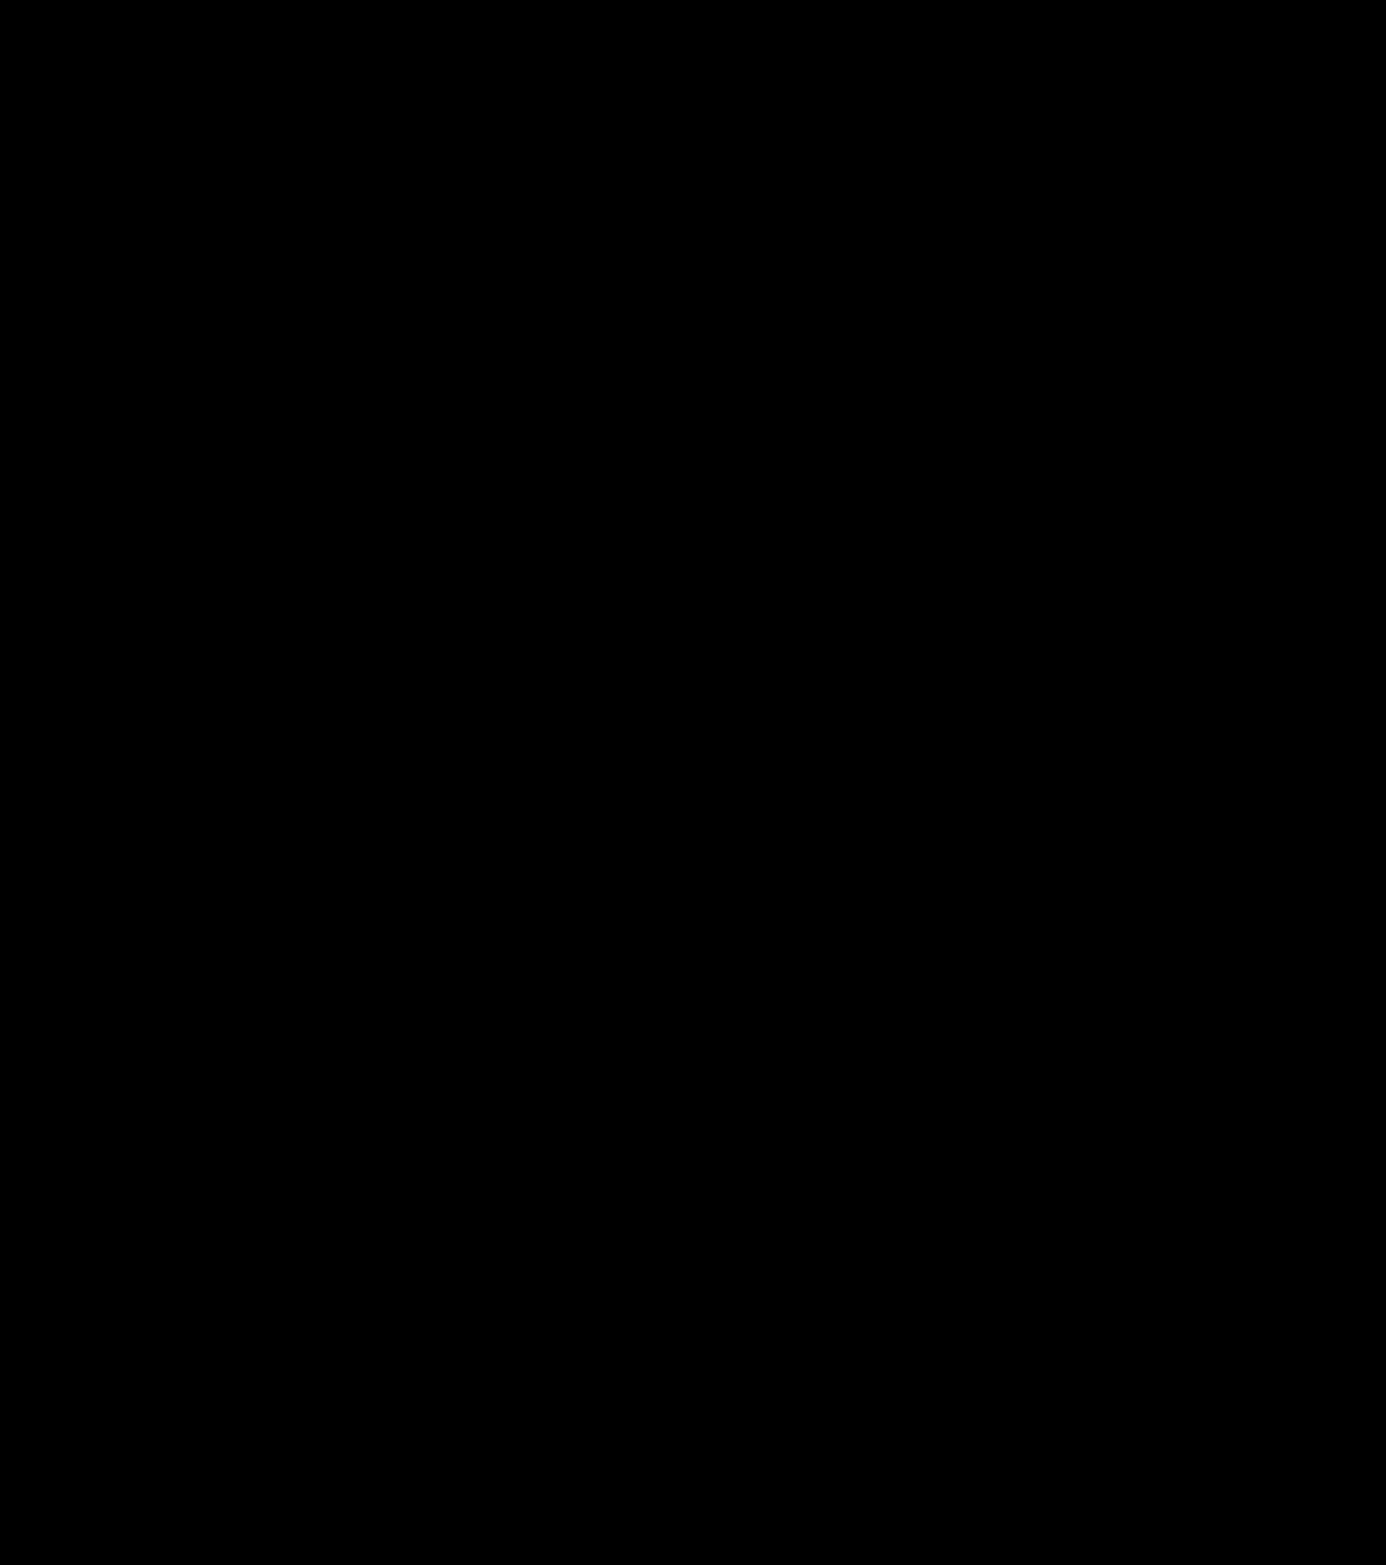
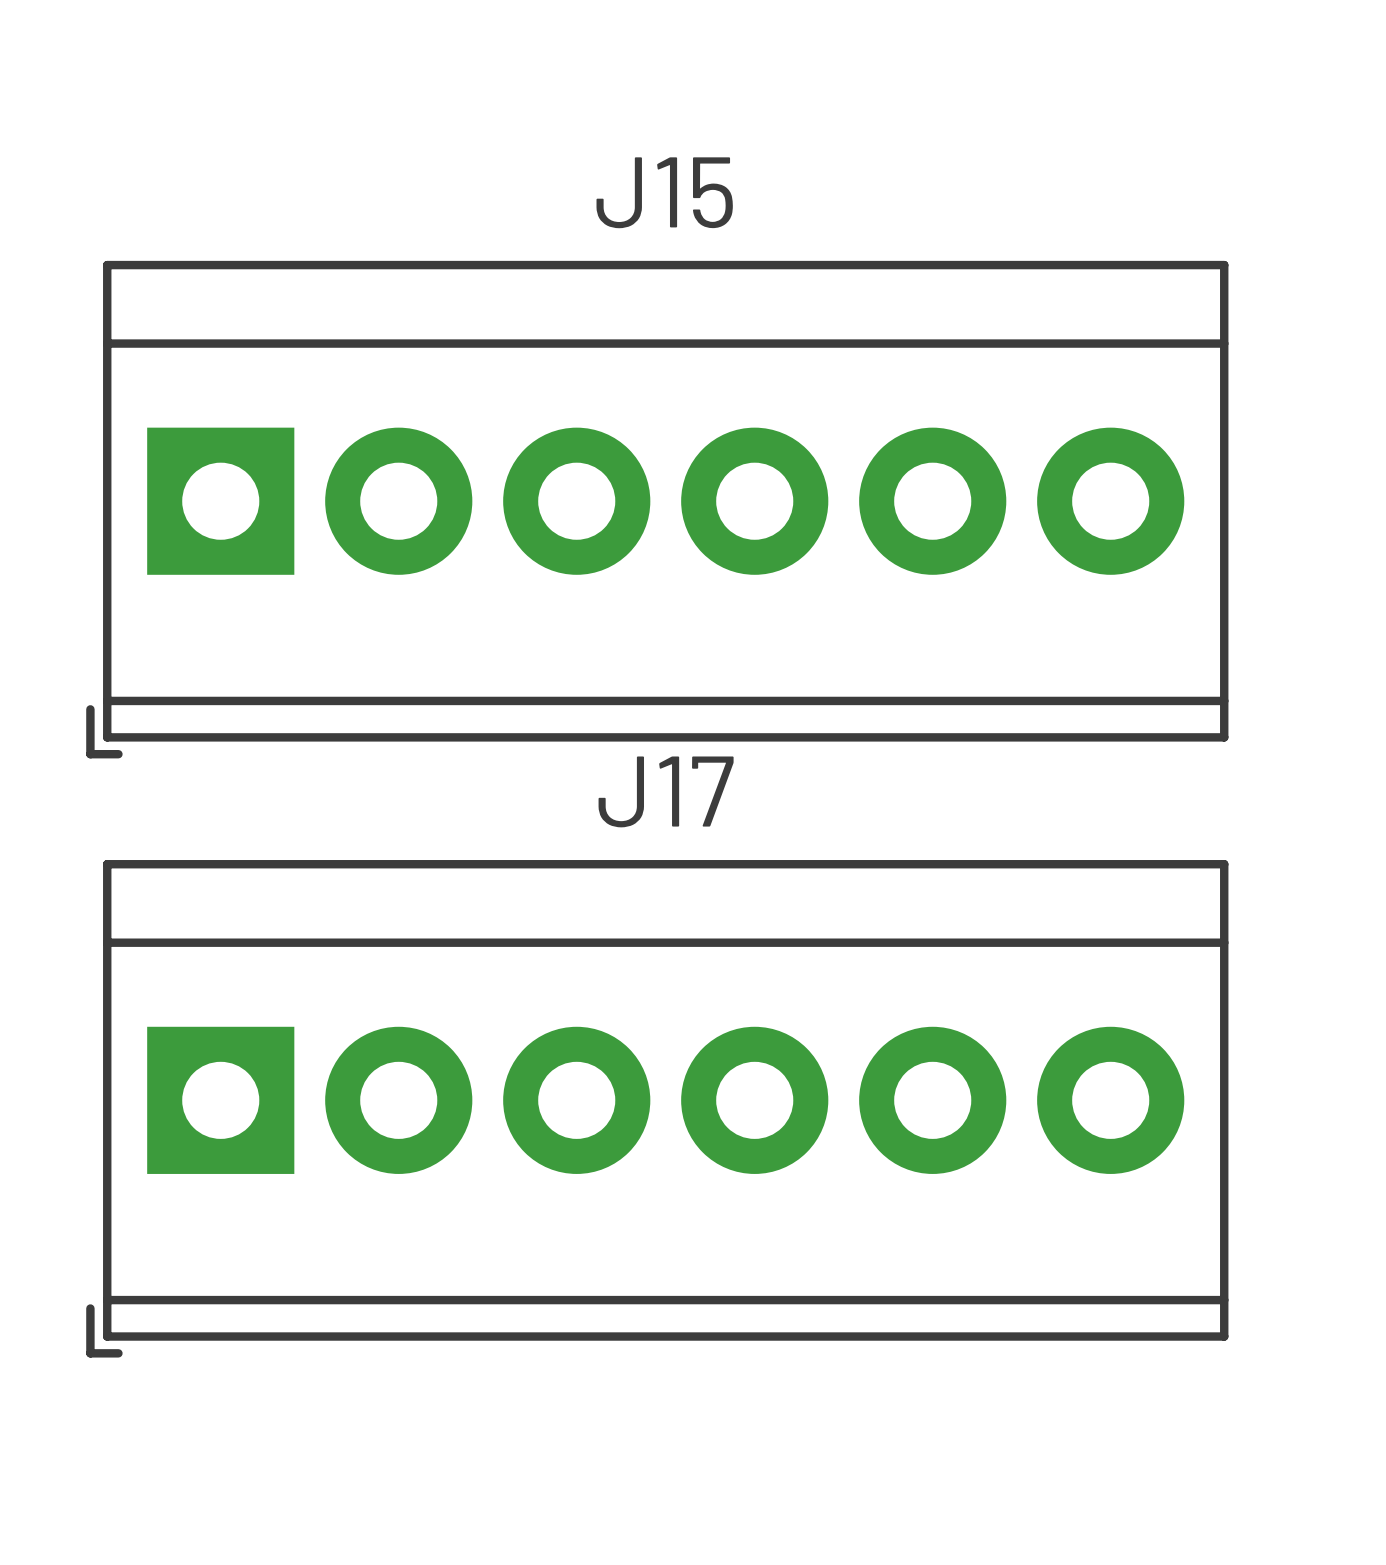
J15: none -> (657, 509)
J17: none -> (657, 1108)

